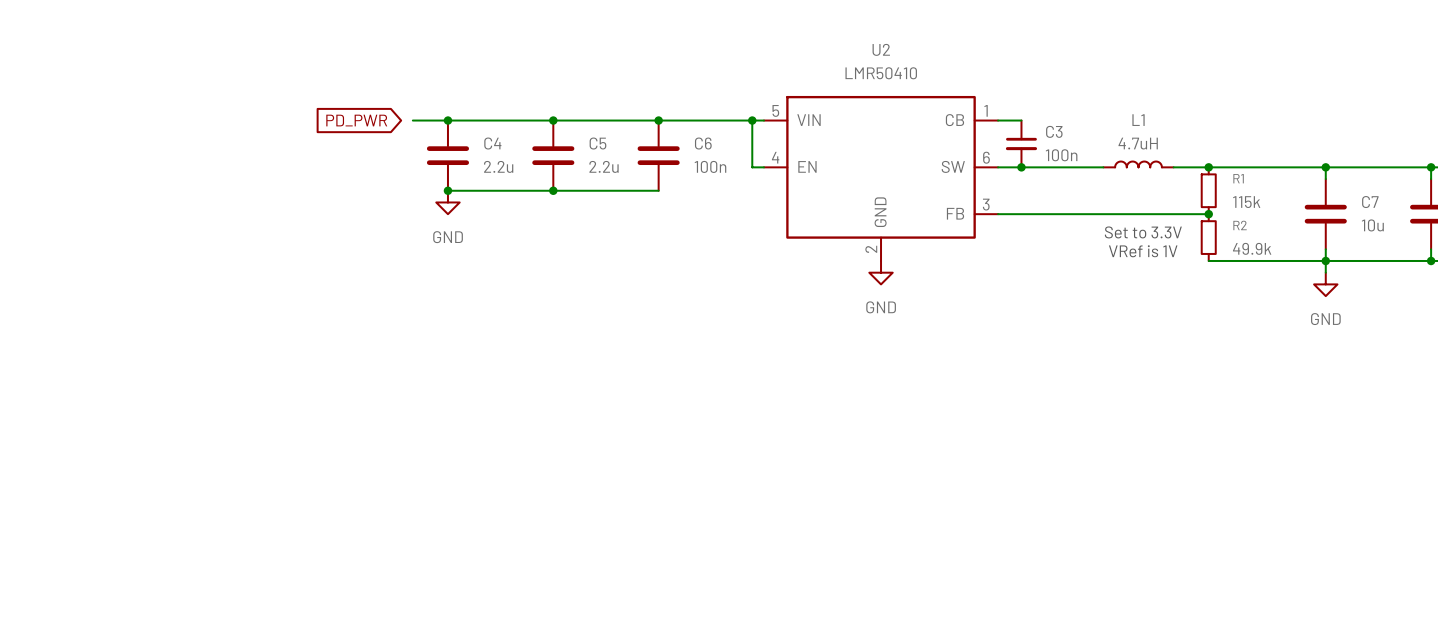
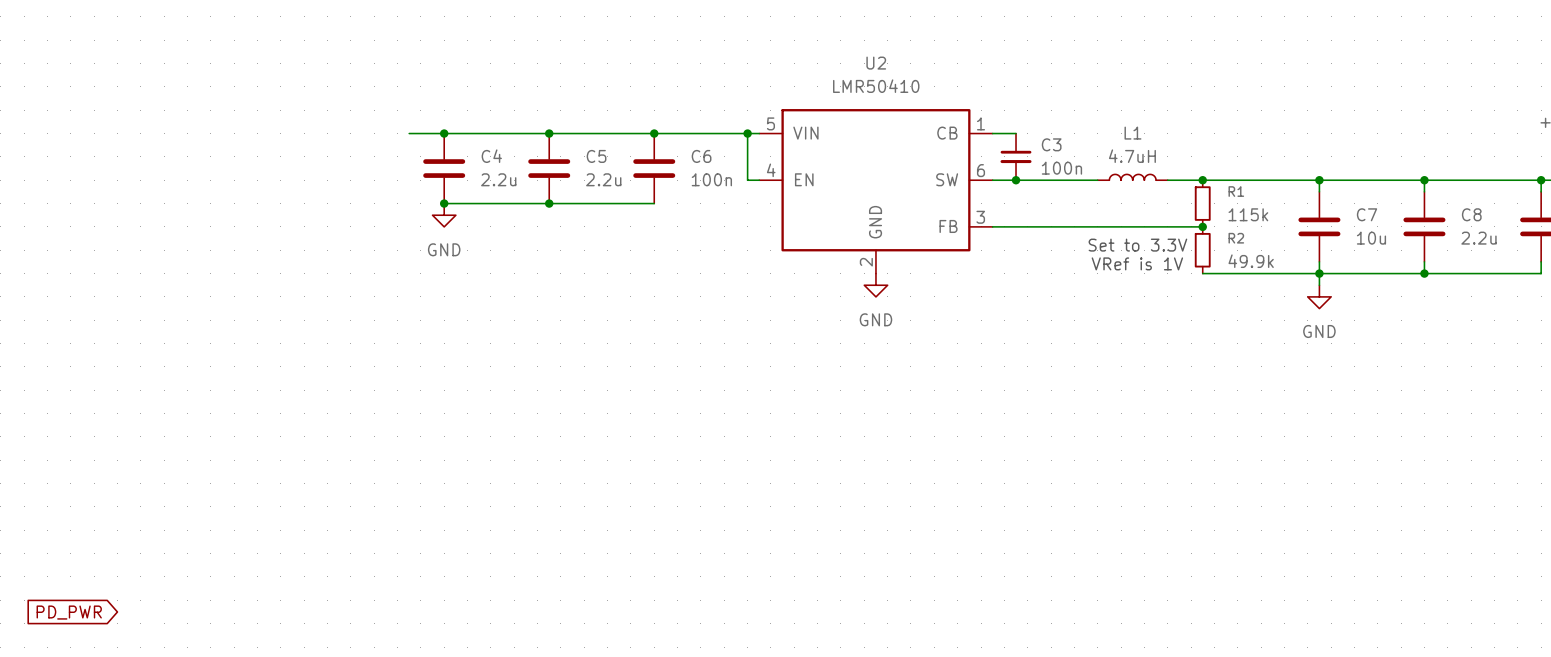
global label: PD_PWR (356, 120) -> none
global label: none -> PD_PWR (69, 612)

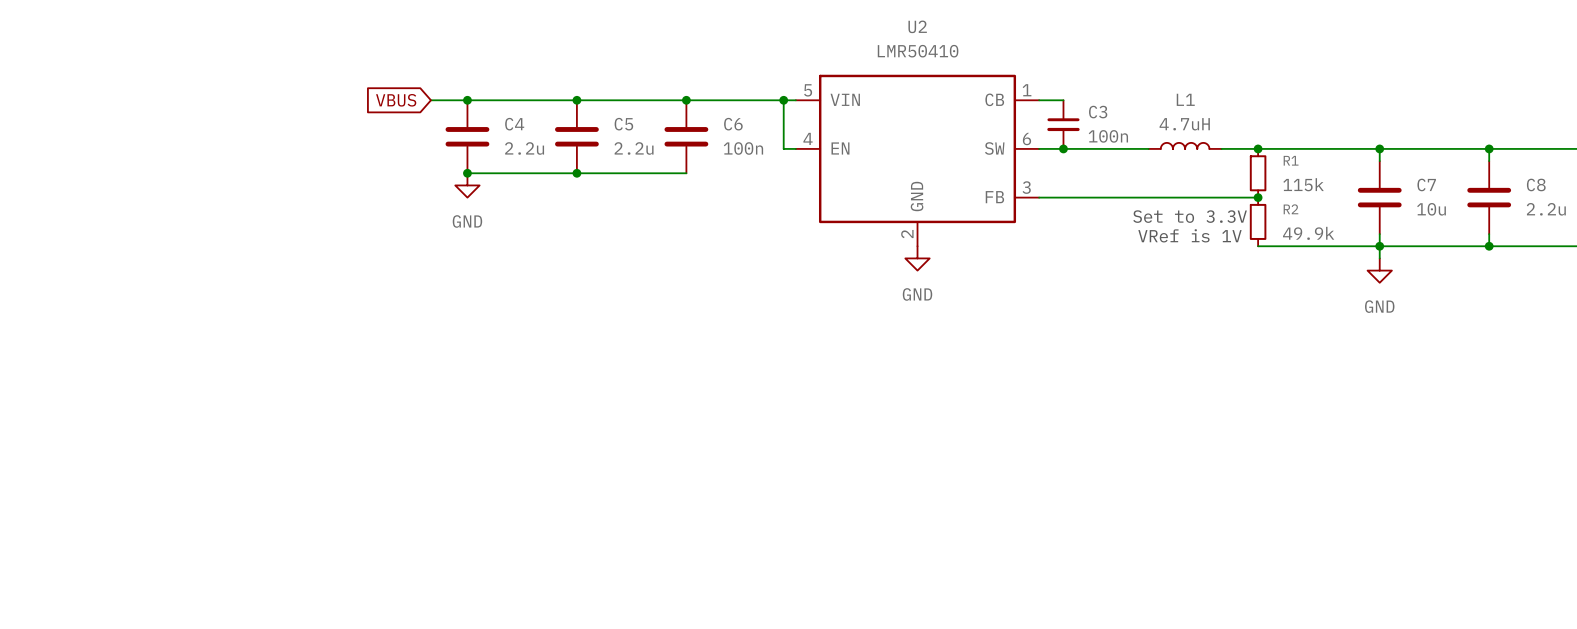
global label: none -> VBUS (396, 100)
global label: PD_PWR (69, 612) -> none

